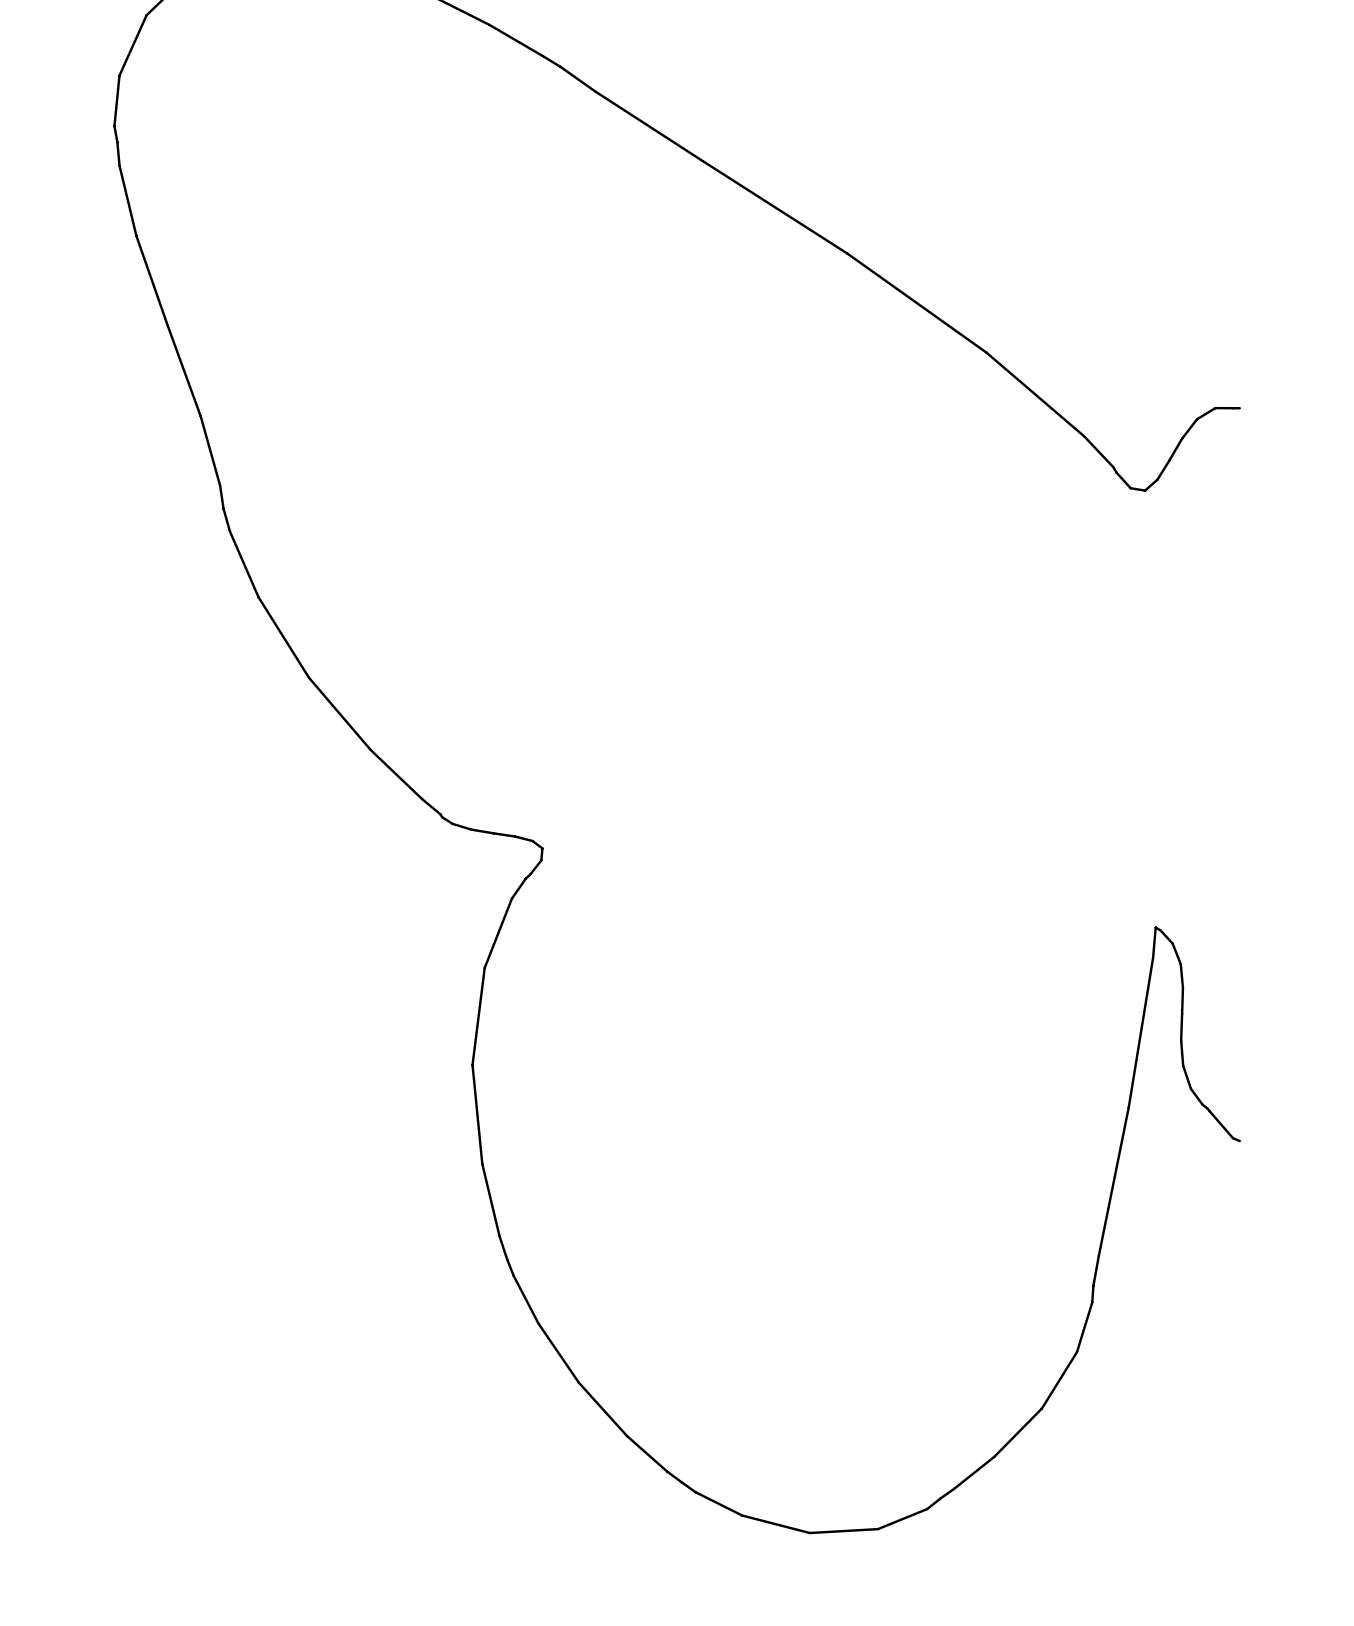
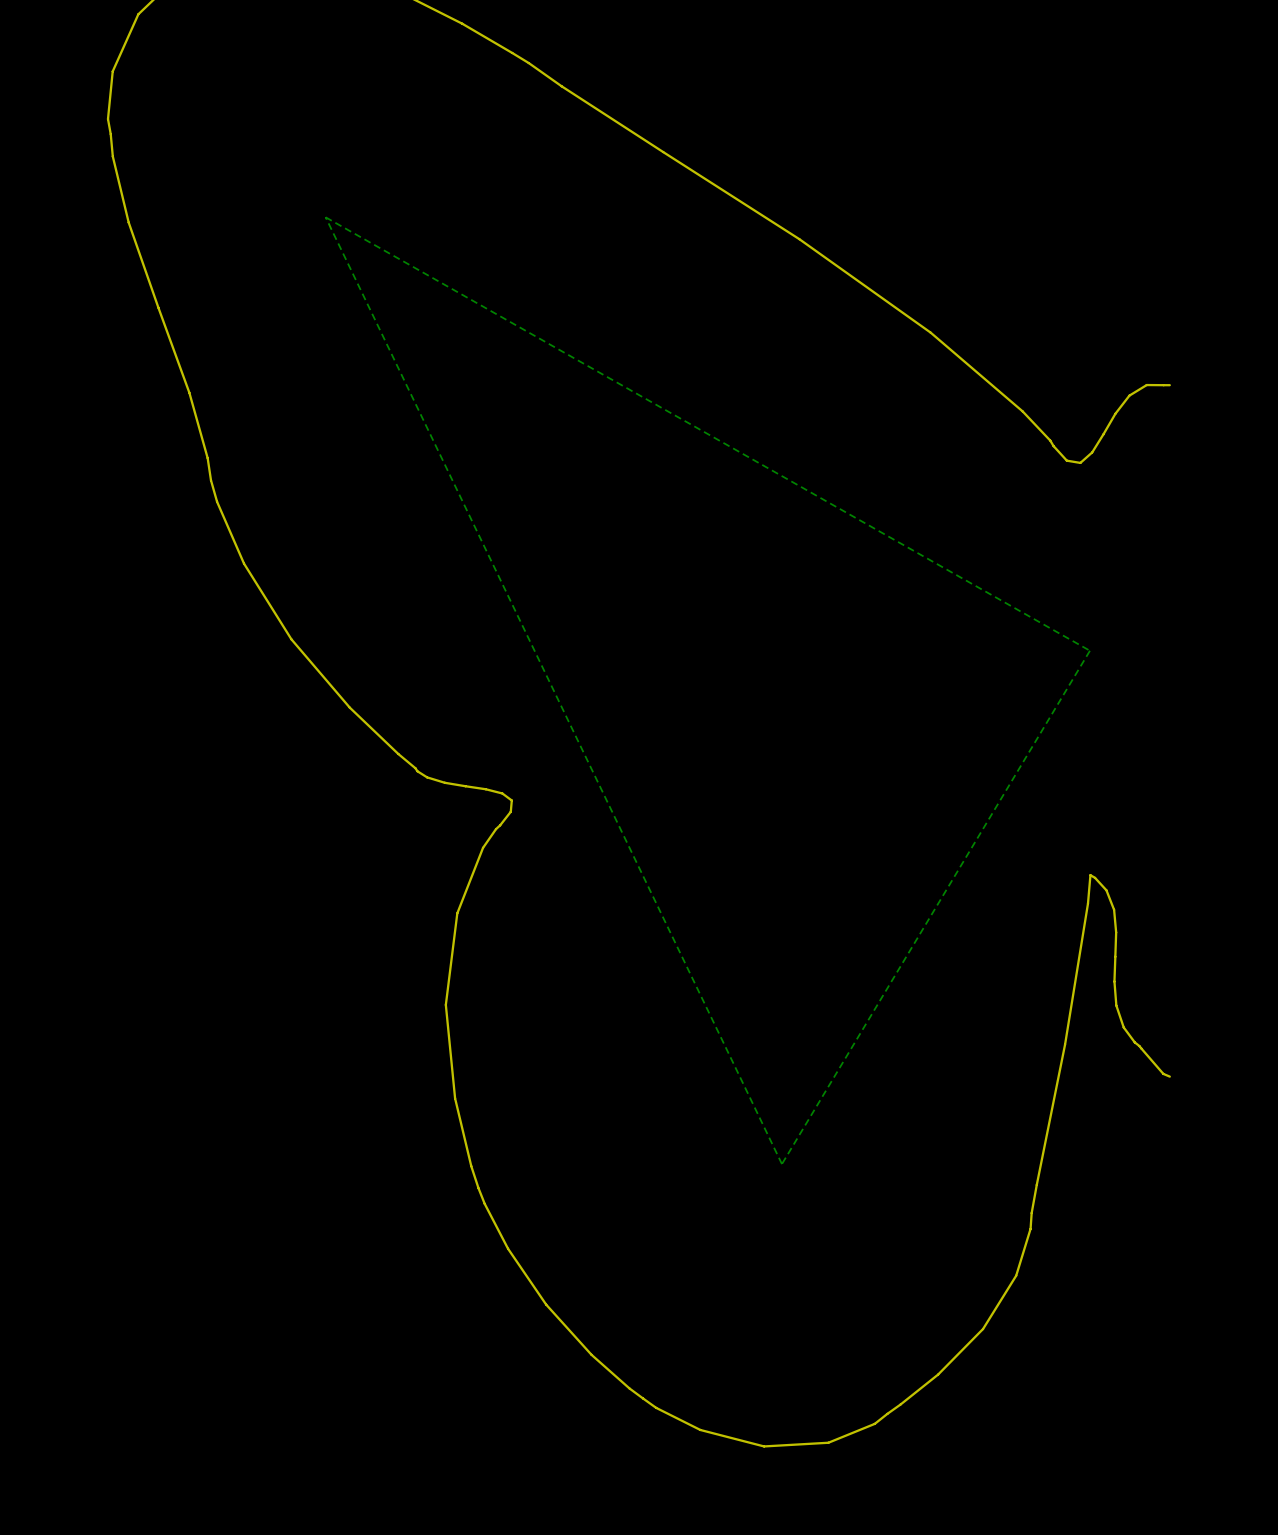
bottom zone outline: none -> (325, 217) (781, 1164) (1089, 650) (325, 217)

